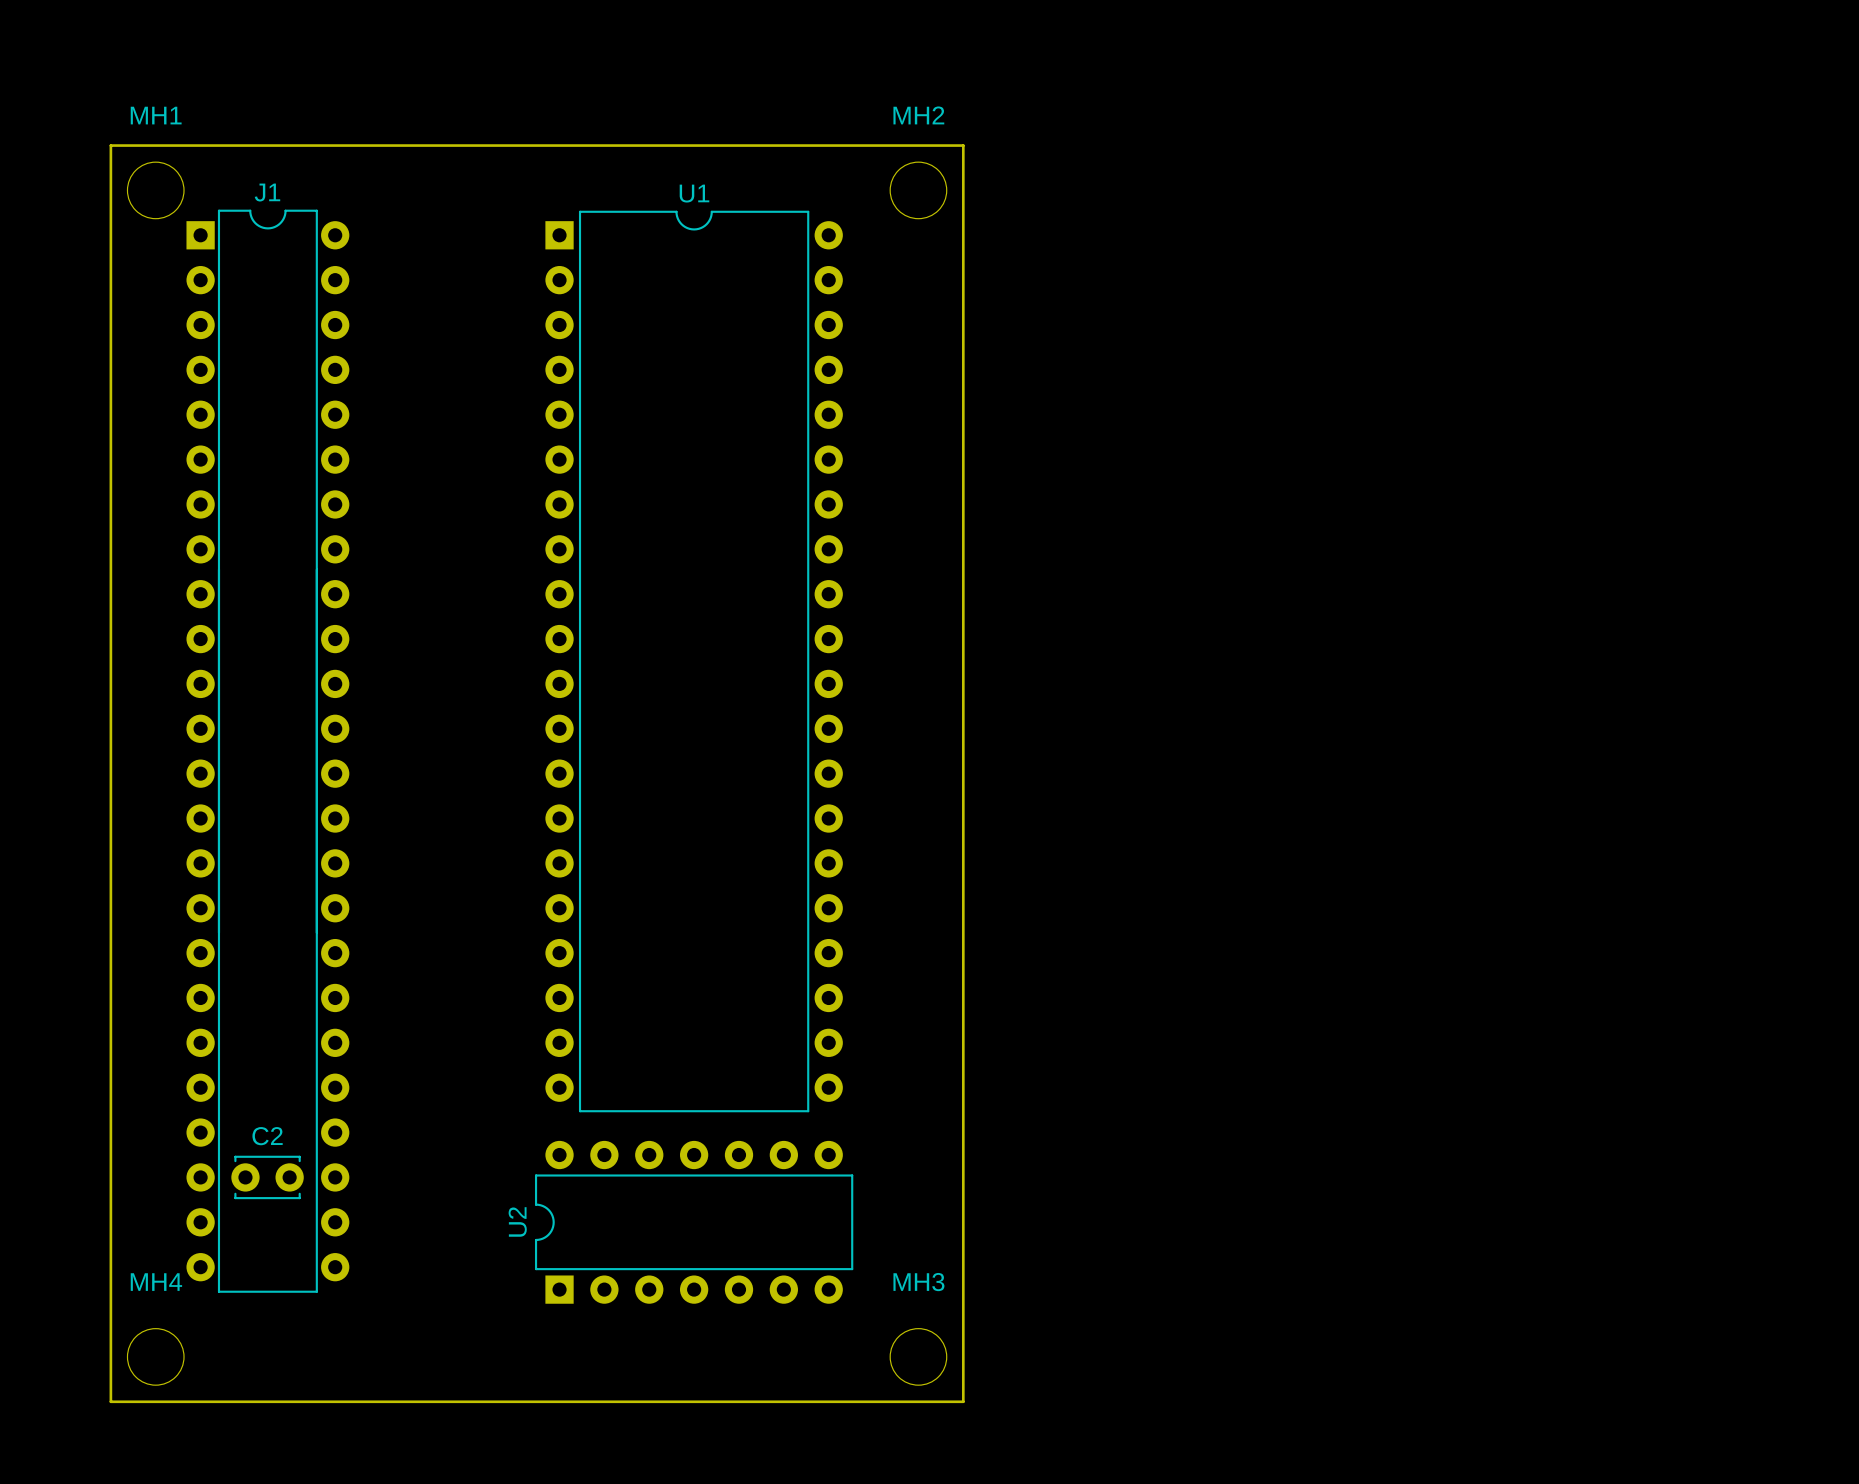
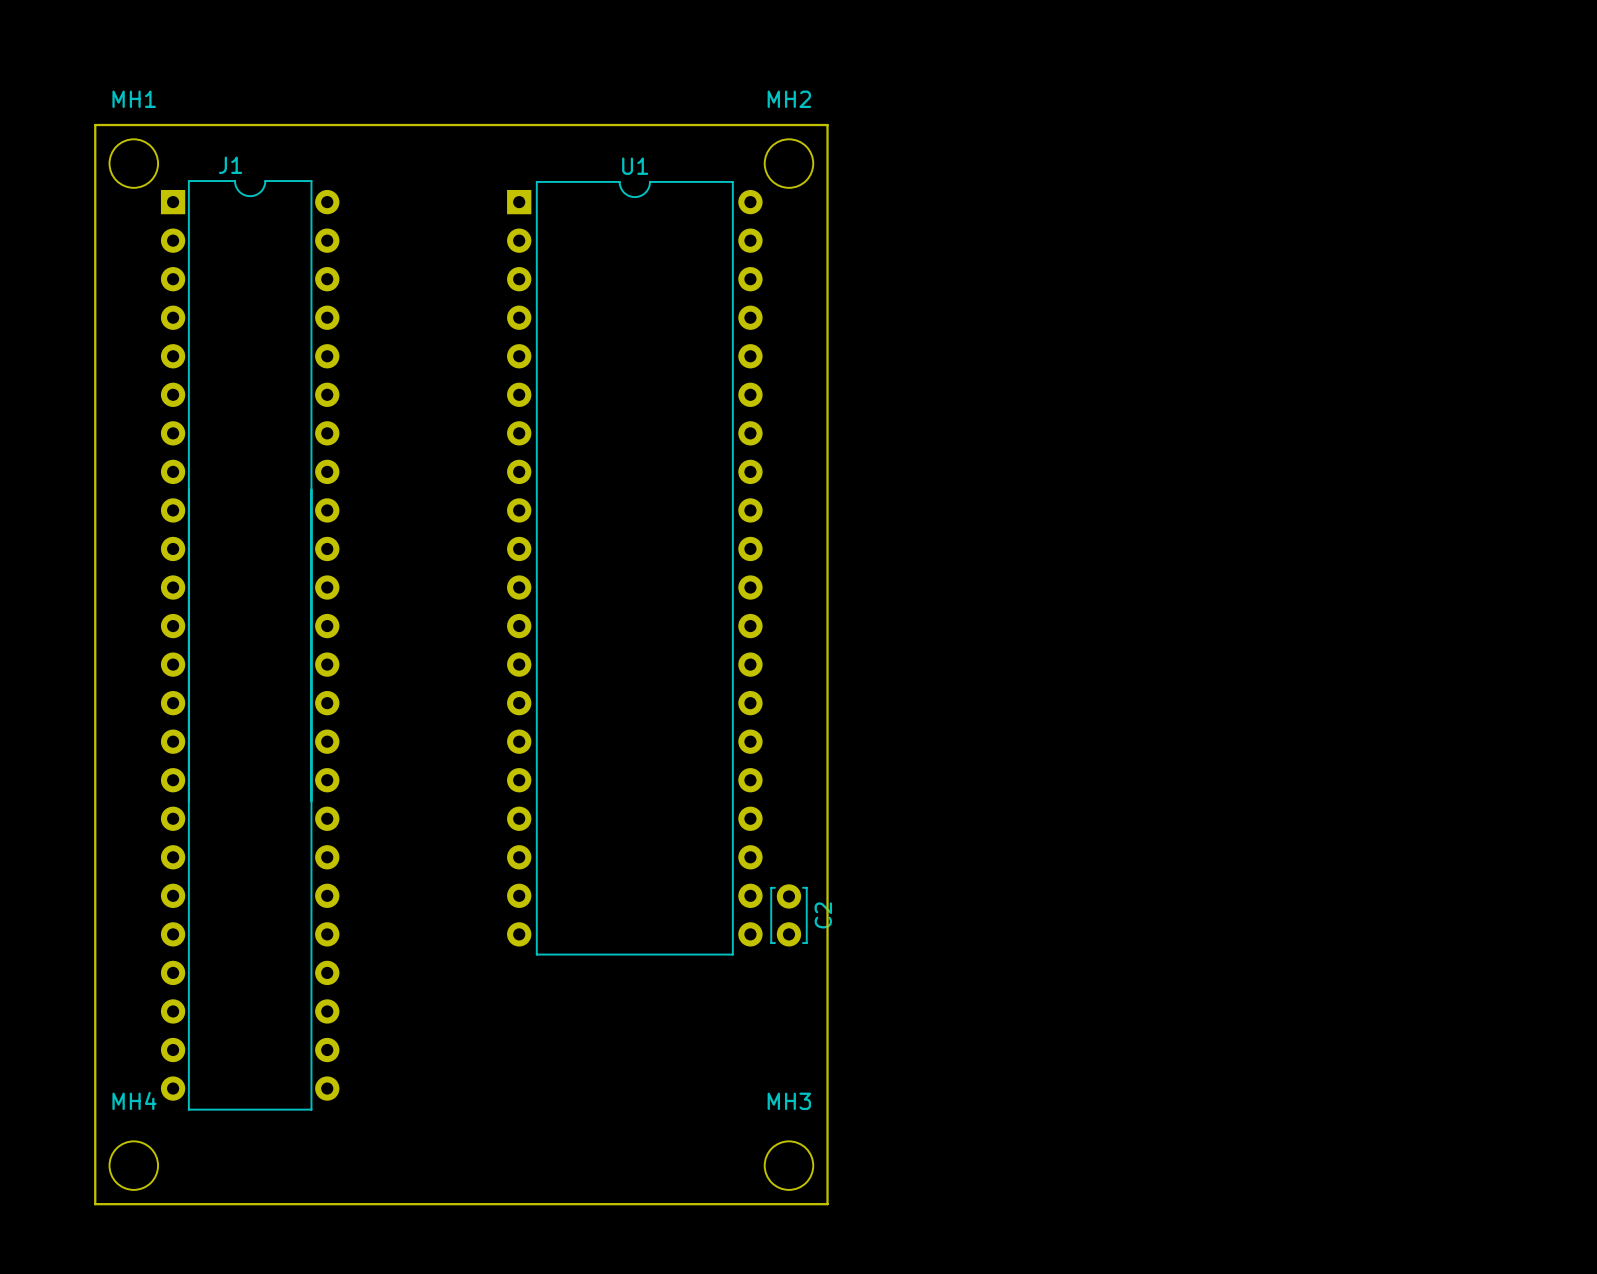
J1 footprint: [186, 209, 350, 1293] -> [160, 180, 340, 1111]
U1 position: (694, 661) -> (634, 568)
C2 rotation: 0° (267, 1177) -> 90° clockwise (788, 915)
C2 position: (267, 1177) -> (788, 915)
U2: (694, 1222) -> none

